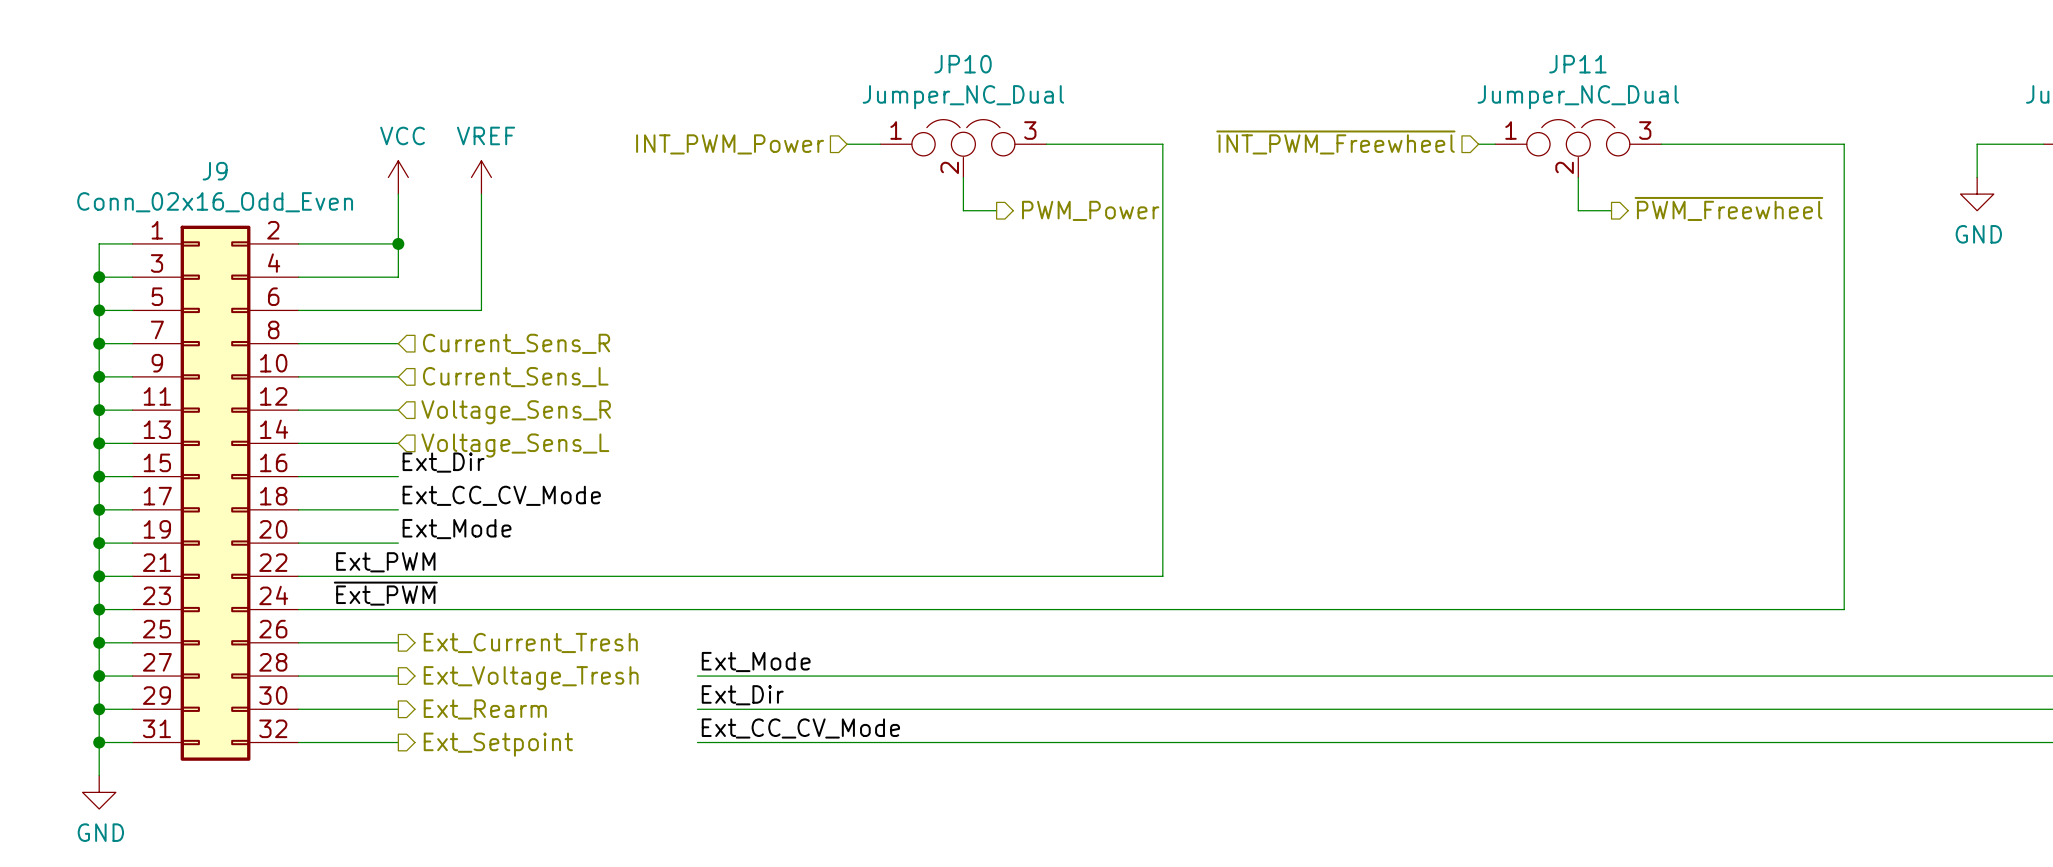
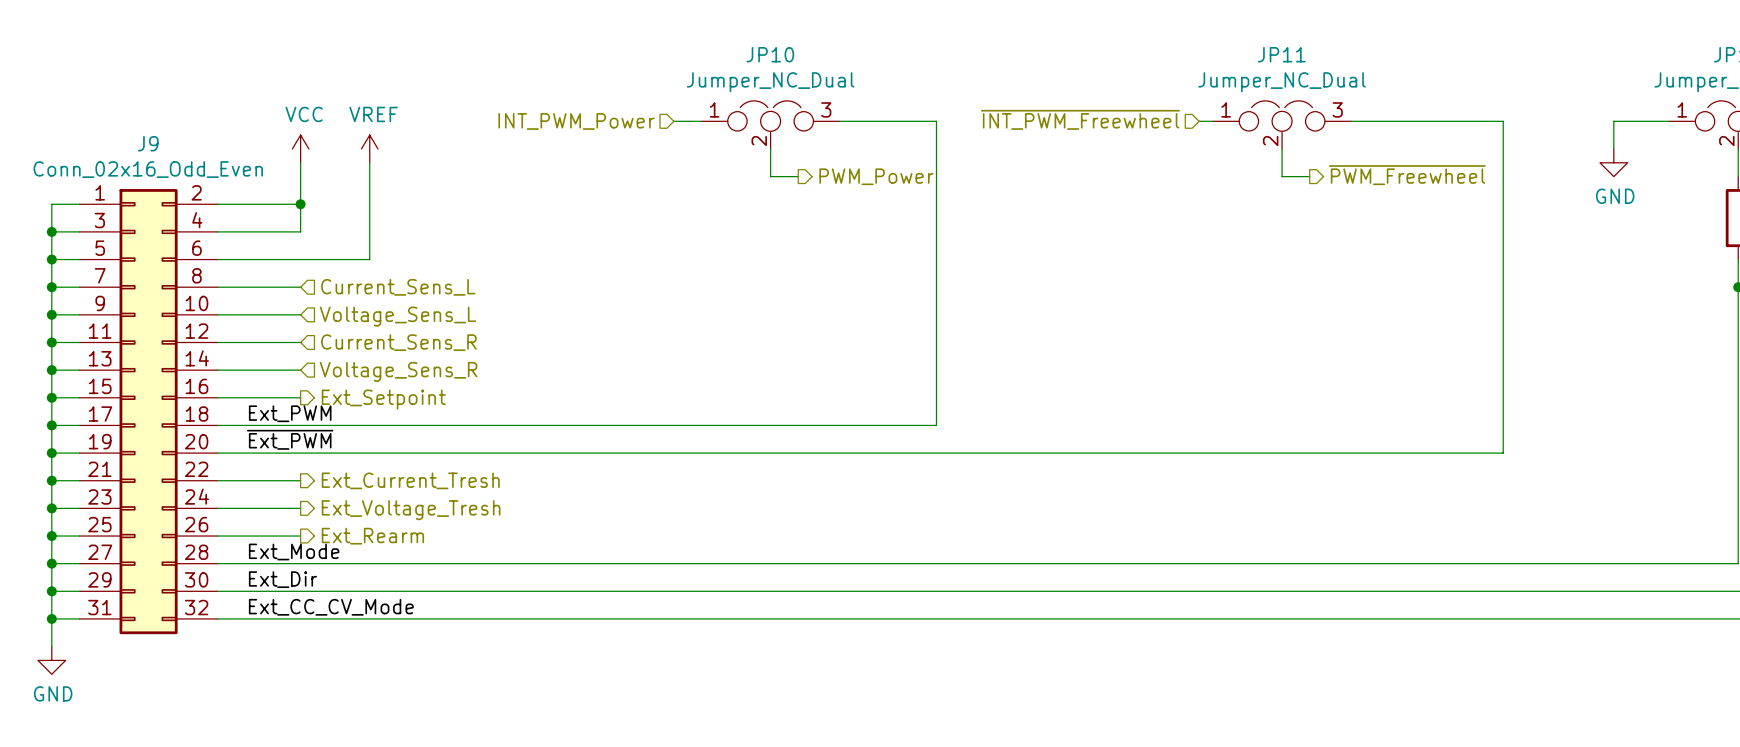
hierarchical label: Current_Sens_R (516, 343) -> Current_Sens_L (398, 287)
hierarchical label: Current_Sens_L (515, 377) -> Voltage_Sens_L (397, 316)
hierarchical label: Voltage_Sens_R (516, 412) -> Current_Sens_R (398, 342)
hierarchical label: Voltage_Sens_L (515, 445) -> Voltage_Sens_R (398, 371)
label: Ext_Dir (443, 462) -> none
label: Ext_CC_CV_Mode (501, 495) -> none
wire: (1162, 509) (1162, 576) (398, 576) -> (936, 425) (300, 425)
label position: Ext_Mode (457, 529) -> Ext_Mode (294, 551)
wire: (1844, 543) (1844, 609) (398, 609) -> (1503, 453) (300, 453)
label position: Ext_PWM (385, 562) -> Ext_PWM (290, 413)
hierarchical label: none -> Ext_Current_Tresh (410, 480)
label position: ~{Ext_PWM} (385, 593) -> ~{Ext_PWM} (290, 439)
hierarchical label: Ext_Current_Tresh (530, 642) -> Ext_Rearm (372, 536)
label: Ext_Mode (756, 662) -> none
wire: none -> (300, 563) (549, 563)
hierarchical label position: Ext_Voltage_Tresh (531, 678) -> Ext_Voltage_Tresh (411, 510)
label: none -> Ext_Dir (282, 579)
label: Ext_Dir (742, 695) -> none
wire: none -> (300, 591) (549, 591)
hierarchical label: Ext_Rearm (485, 709) -> none
label: none -> Ext_CC_CV_Mode (331, 607)
label: Ext_CC_CV_Mode (800, 728) -> none
wire: none -> (300, 618) (549, 618)
hierarchical label position: Ext_Setpoint (498, 744) -> Ext_Setpoint (383, 399)

